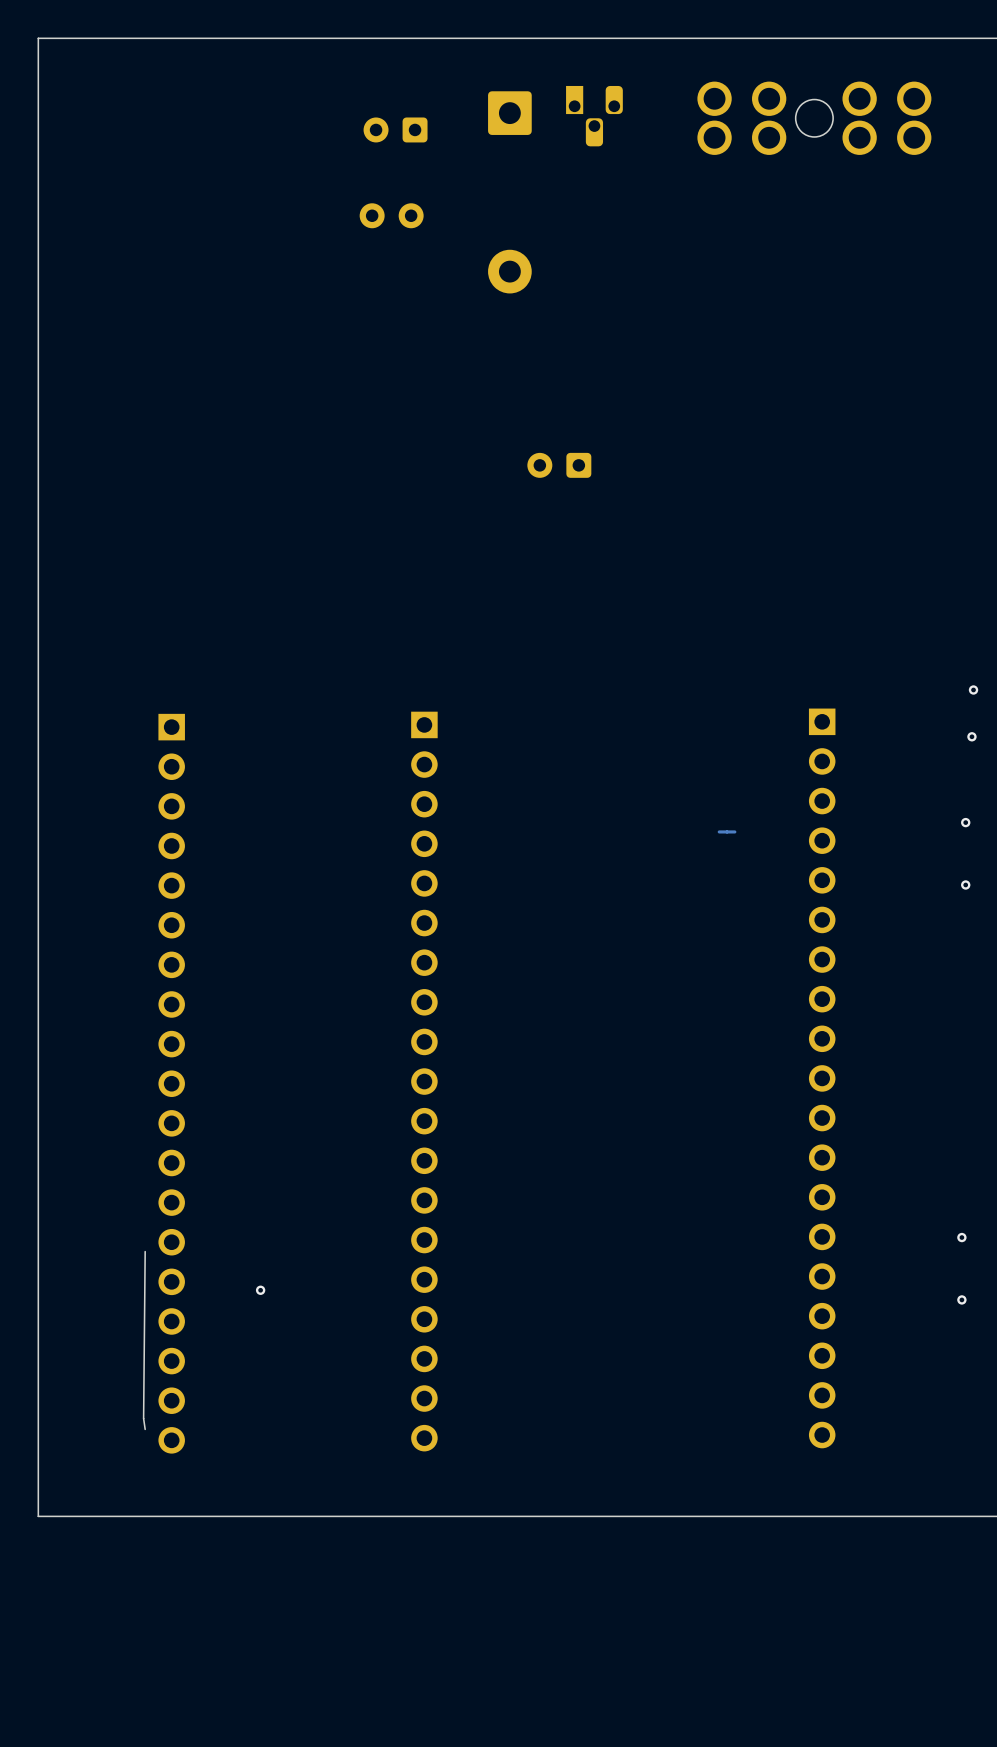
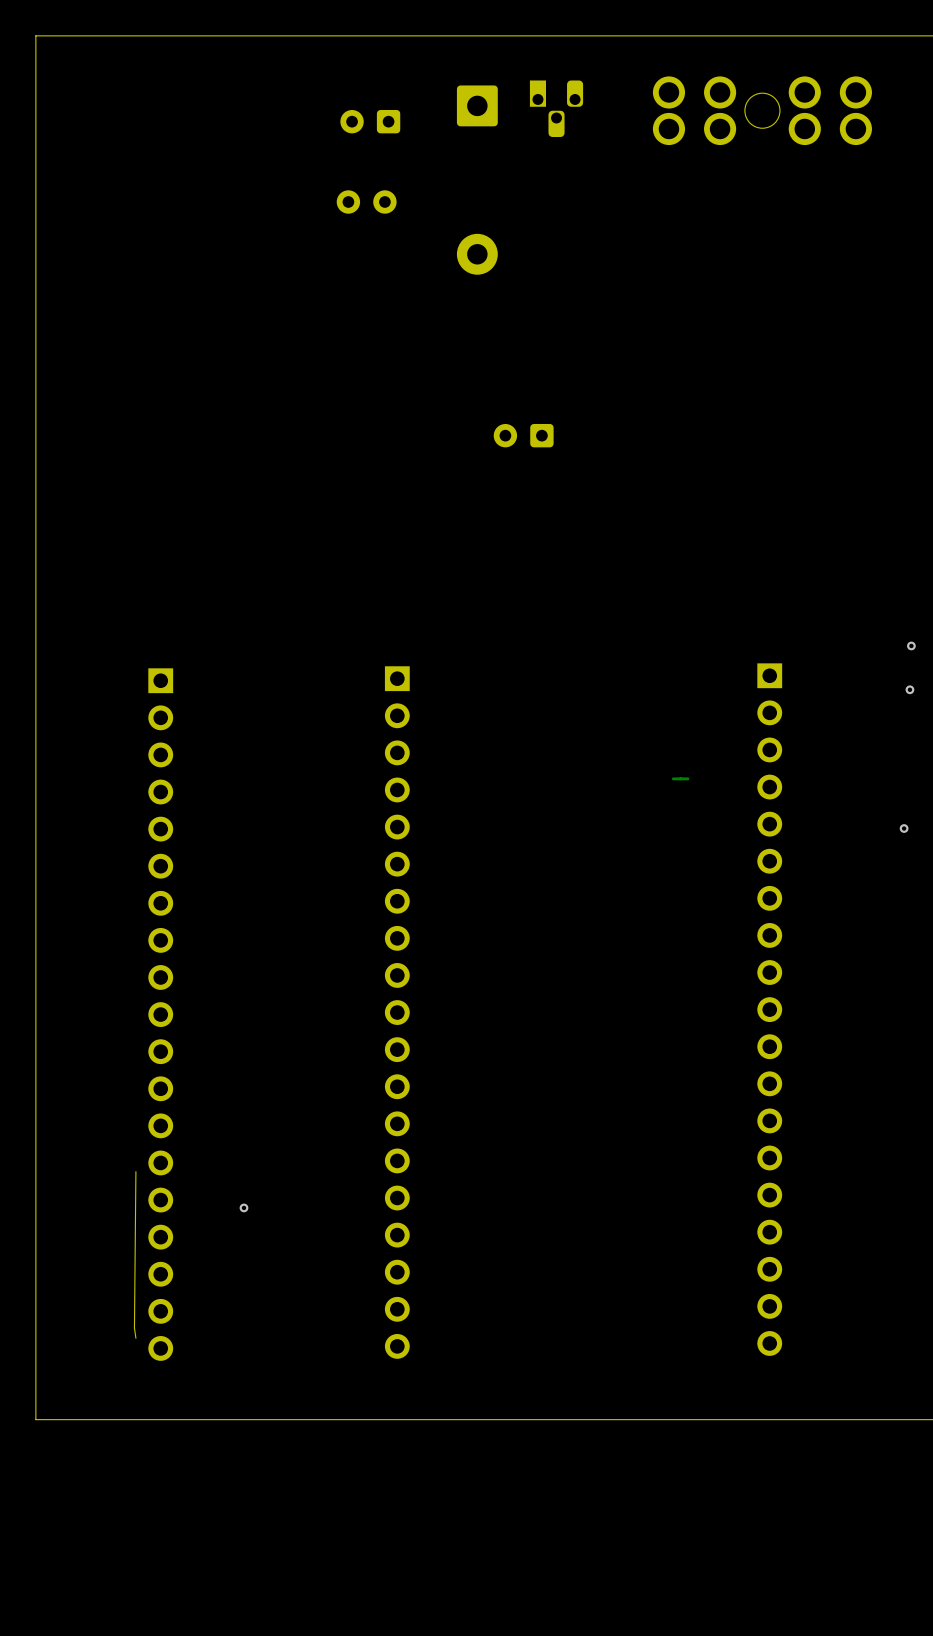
via: (965, 822) -> none
via: (961, 1237) -> none
via: (961, 1299) -> none

